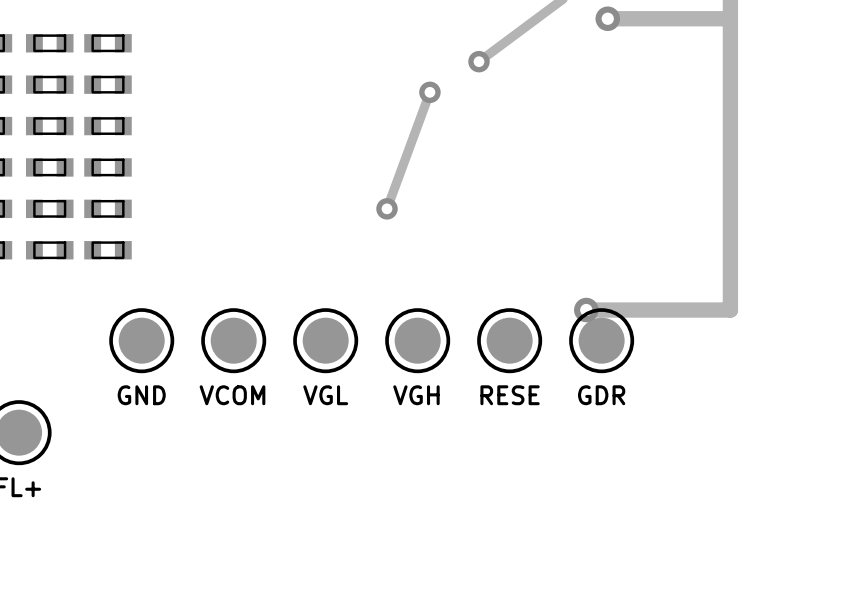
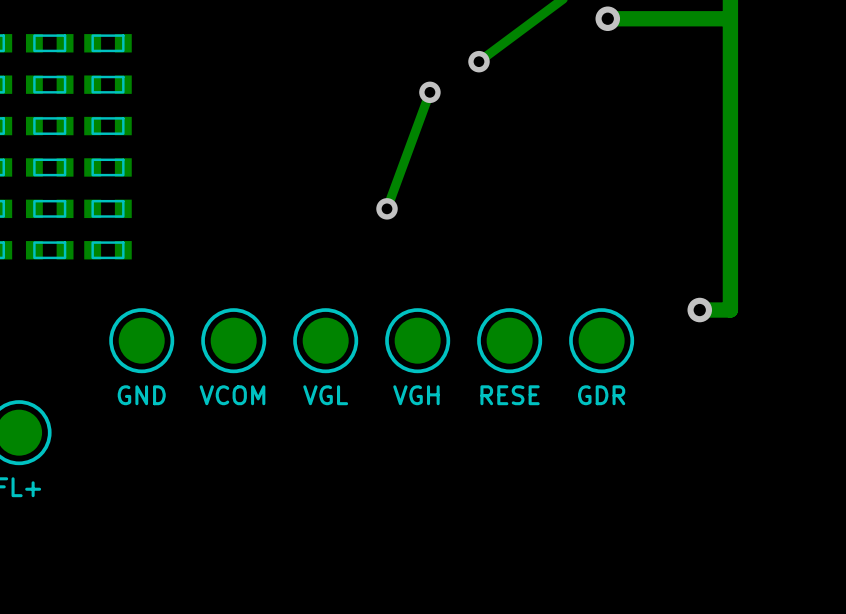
via position: (586, 310) -> (699, 310)
track: (699, 310) (586, 310) -> none

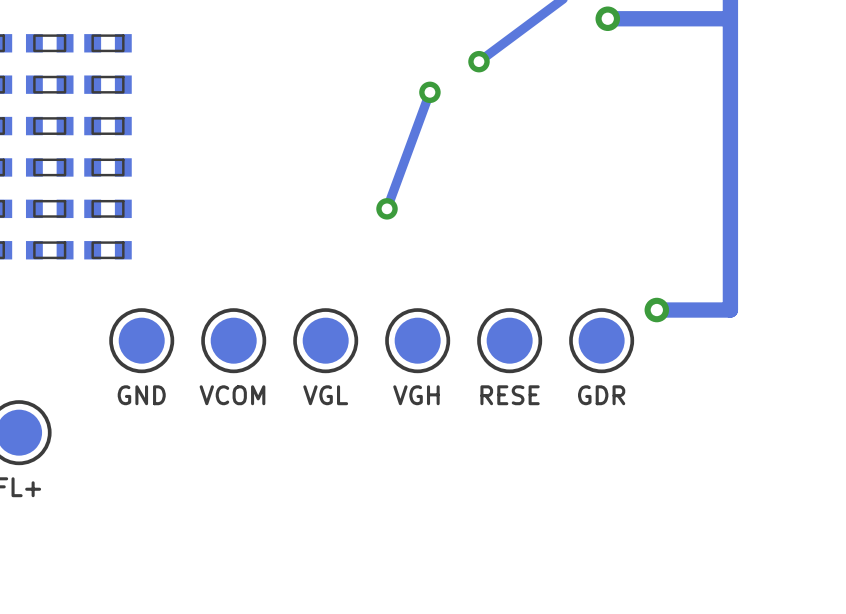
track: none -> (699, 310) (656, 310)
via position: (699, 310) -> (656, 310)

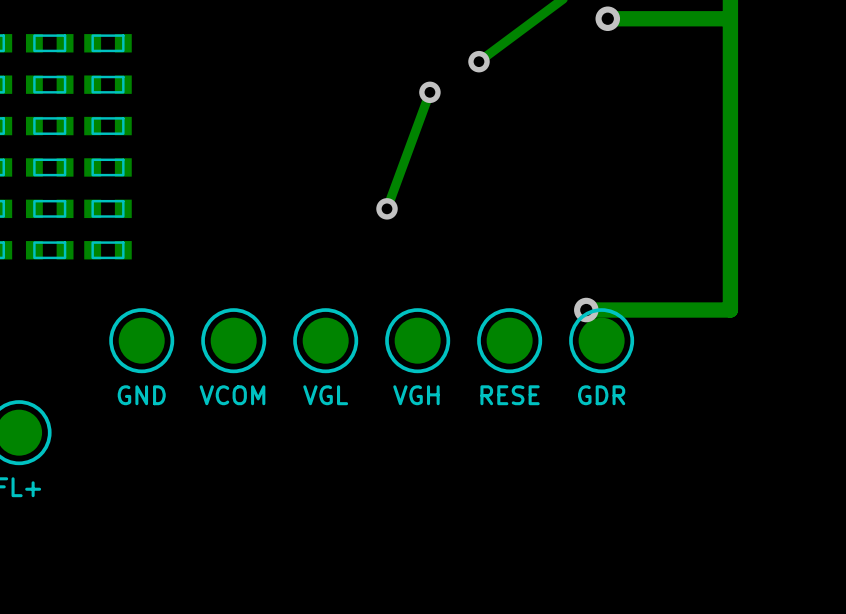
track: none -> (656, 310) (586, 310)
via position: (656, 310) -> (586, 310)

